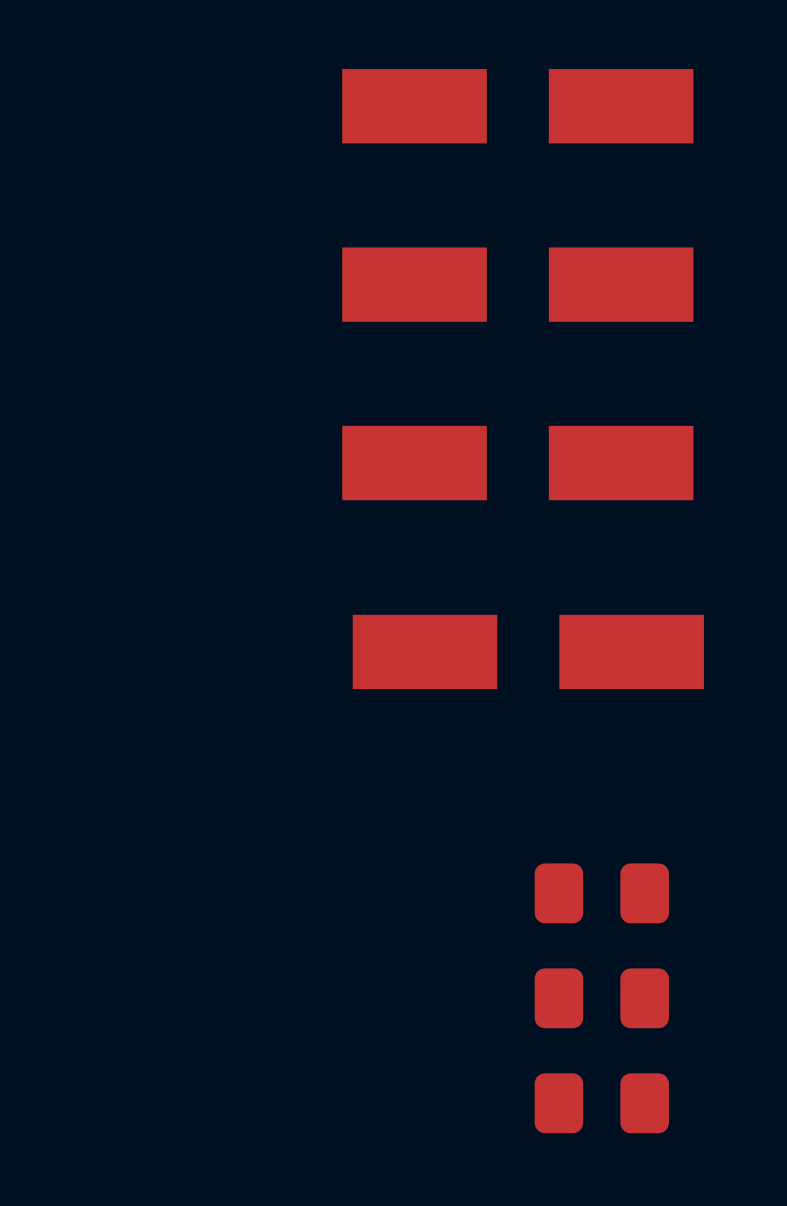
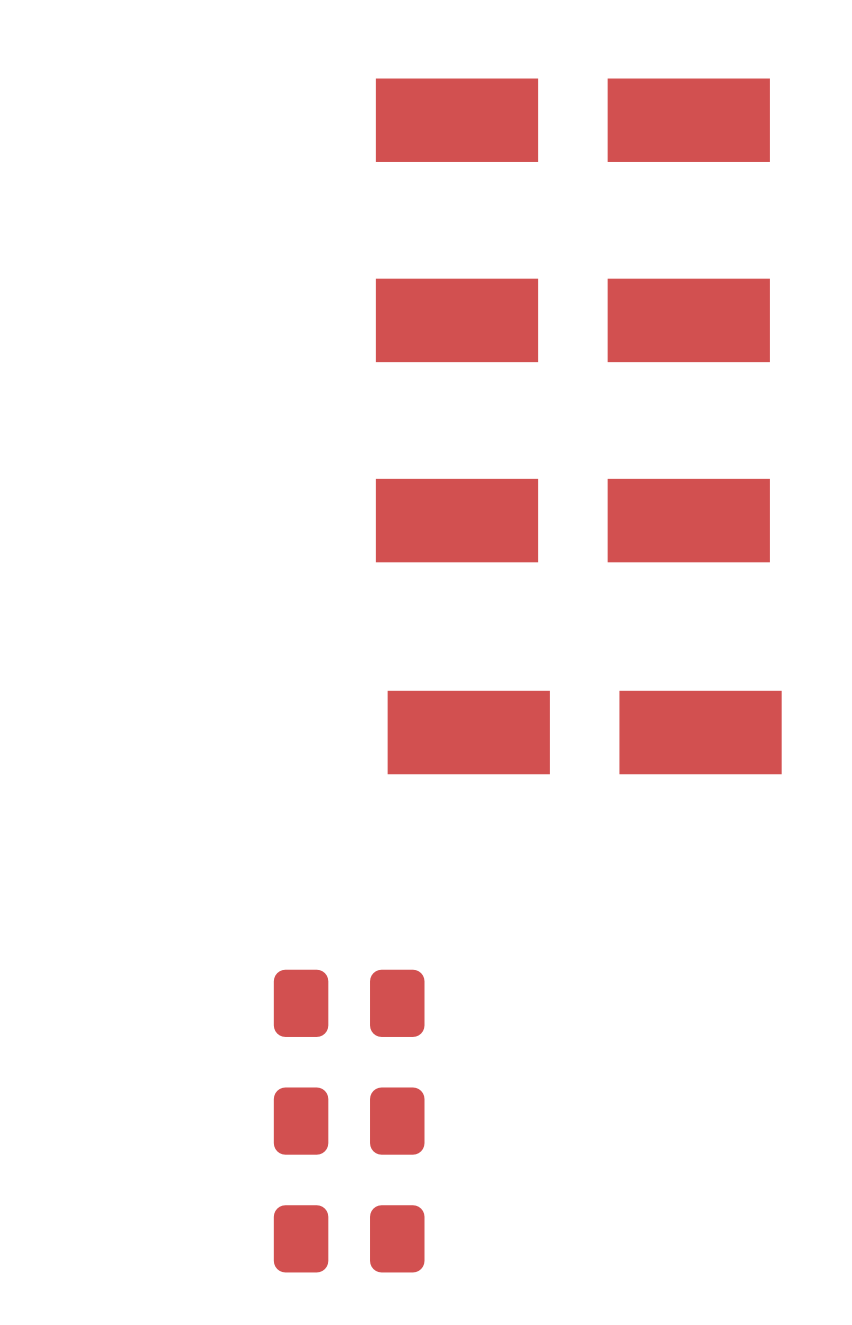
part: none -> (349, 1003)
part: (601, 893) -> none
part: none -> (349, 1121)
part: (601, 998) -> none
part: none -> (349, 1238)
part: (601, 1103) -> none

